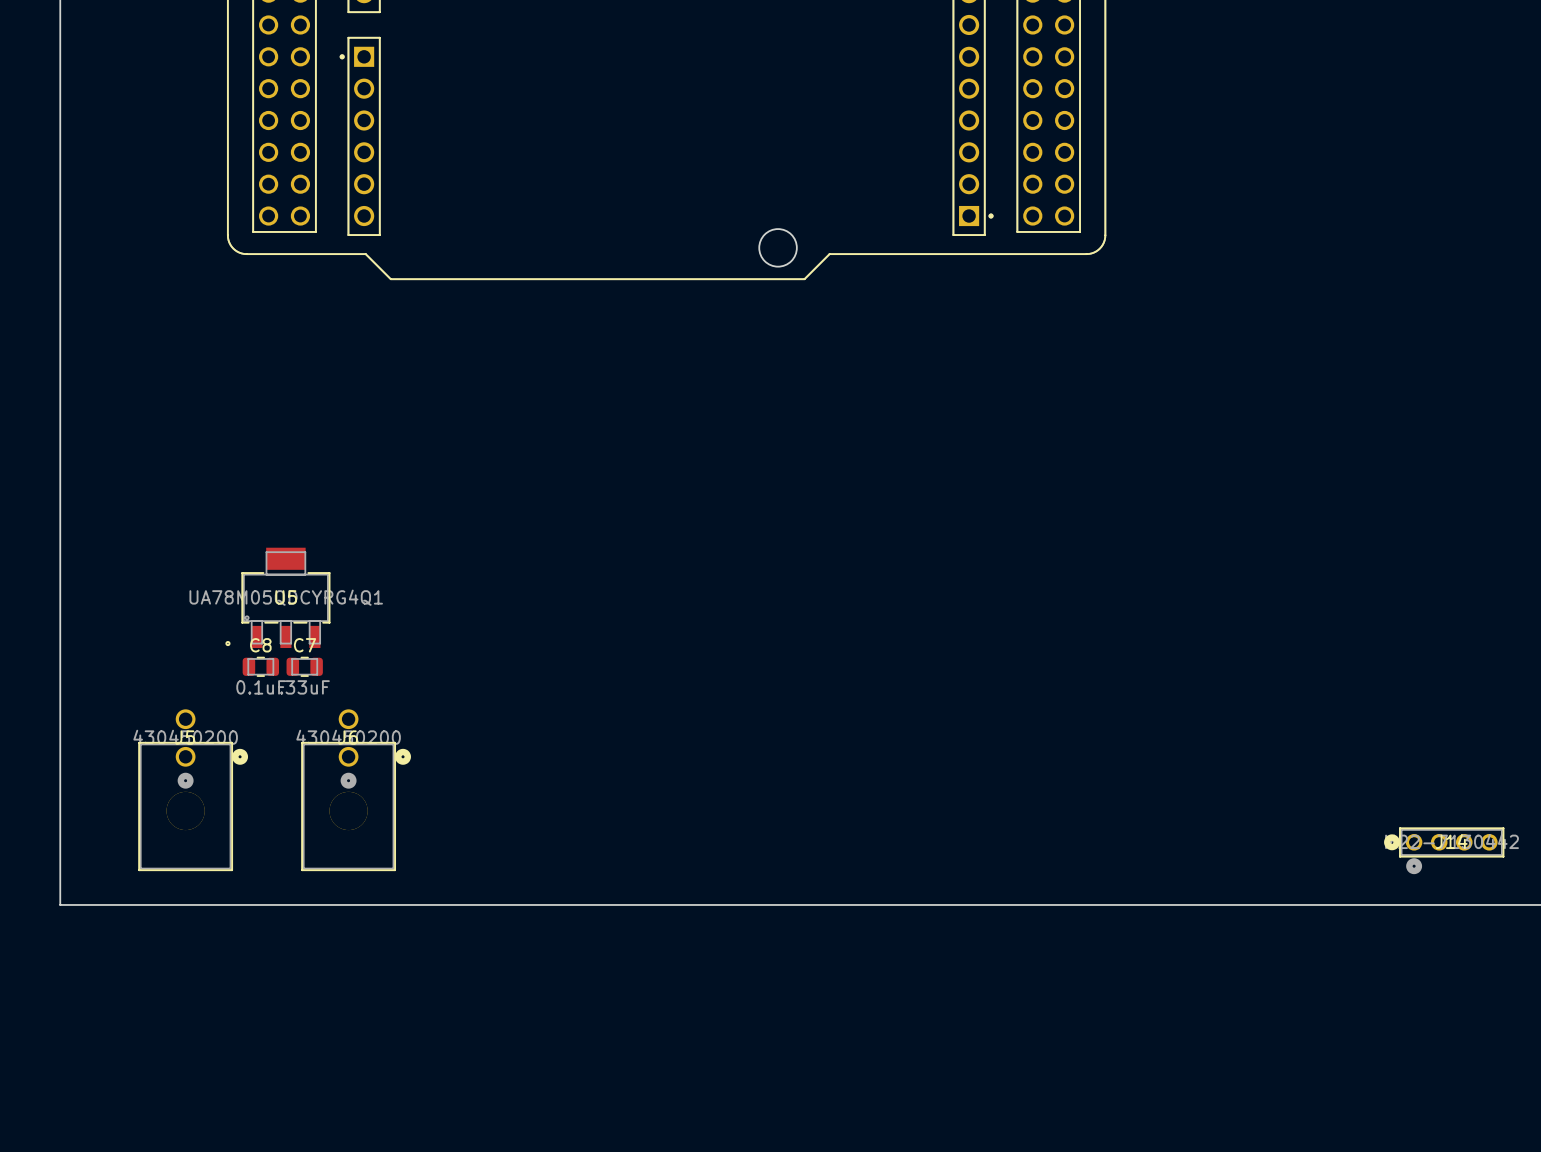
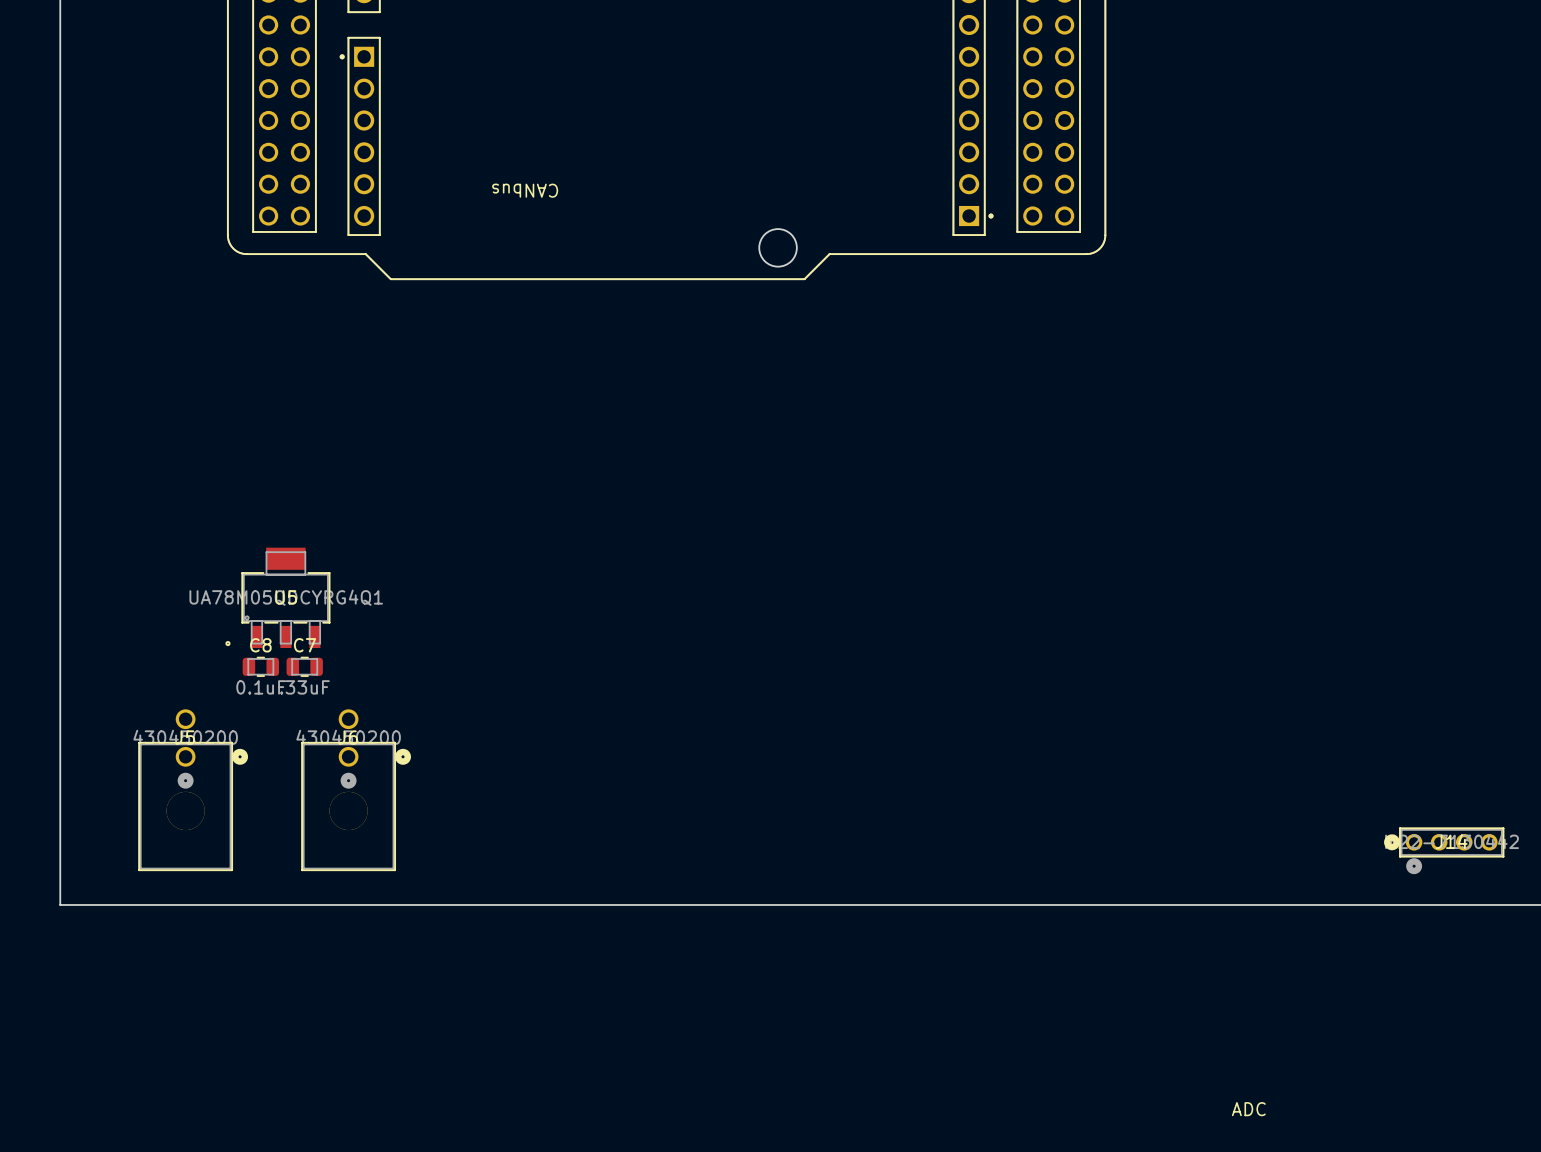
text: none -> CANbus (525, 190)
text: none -> ADC (1248, 1109)

